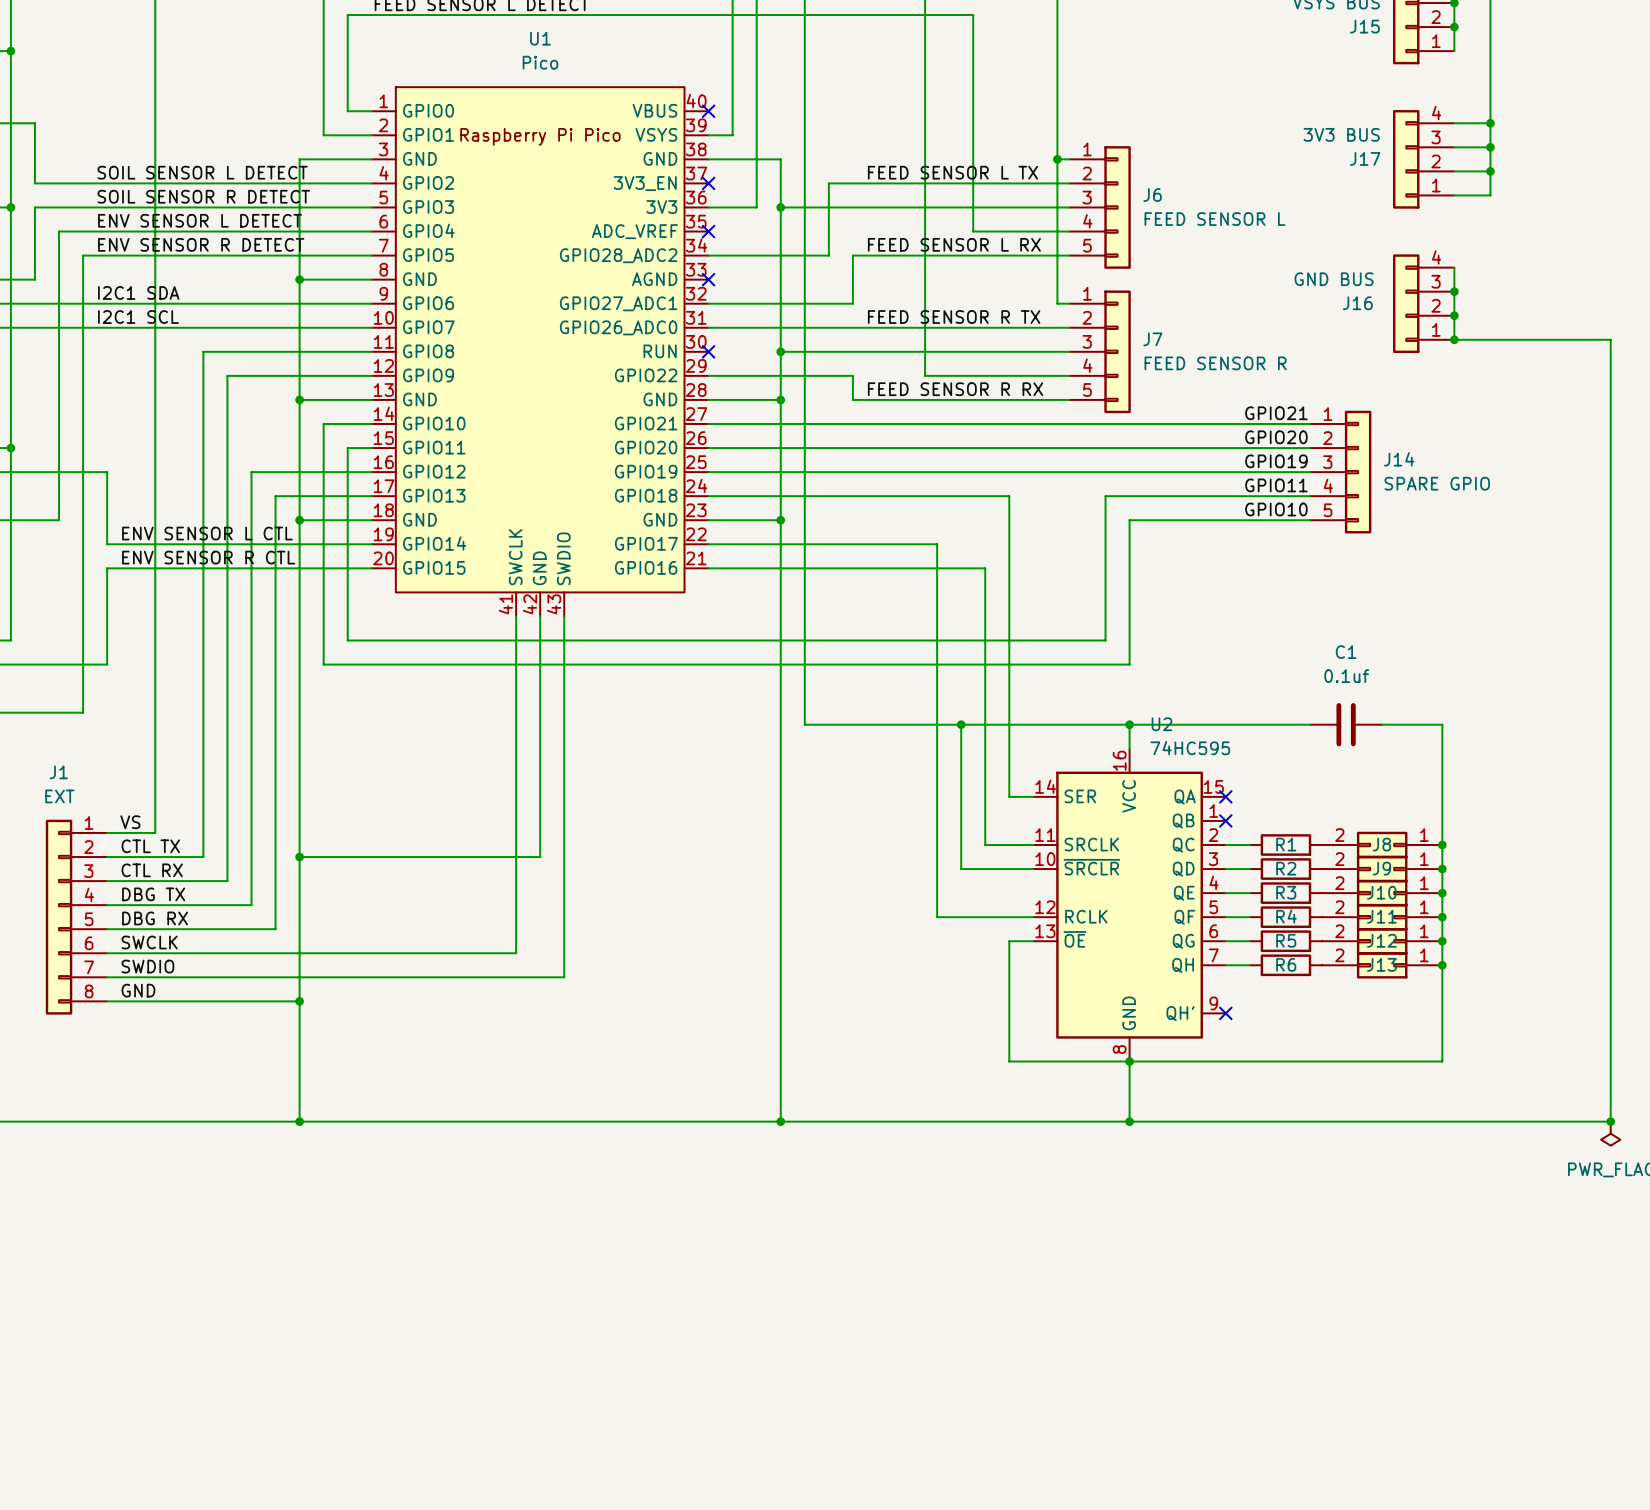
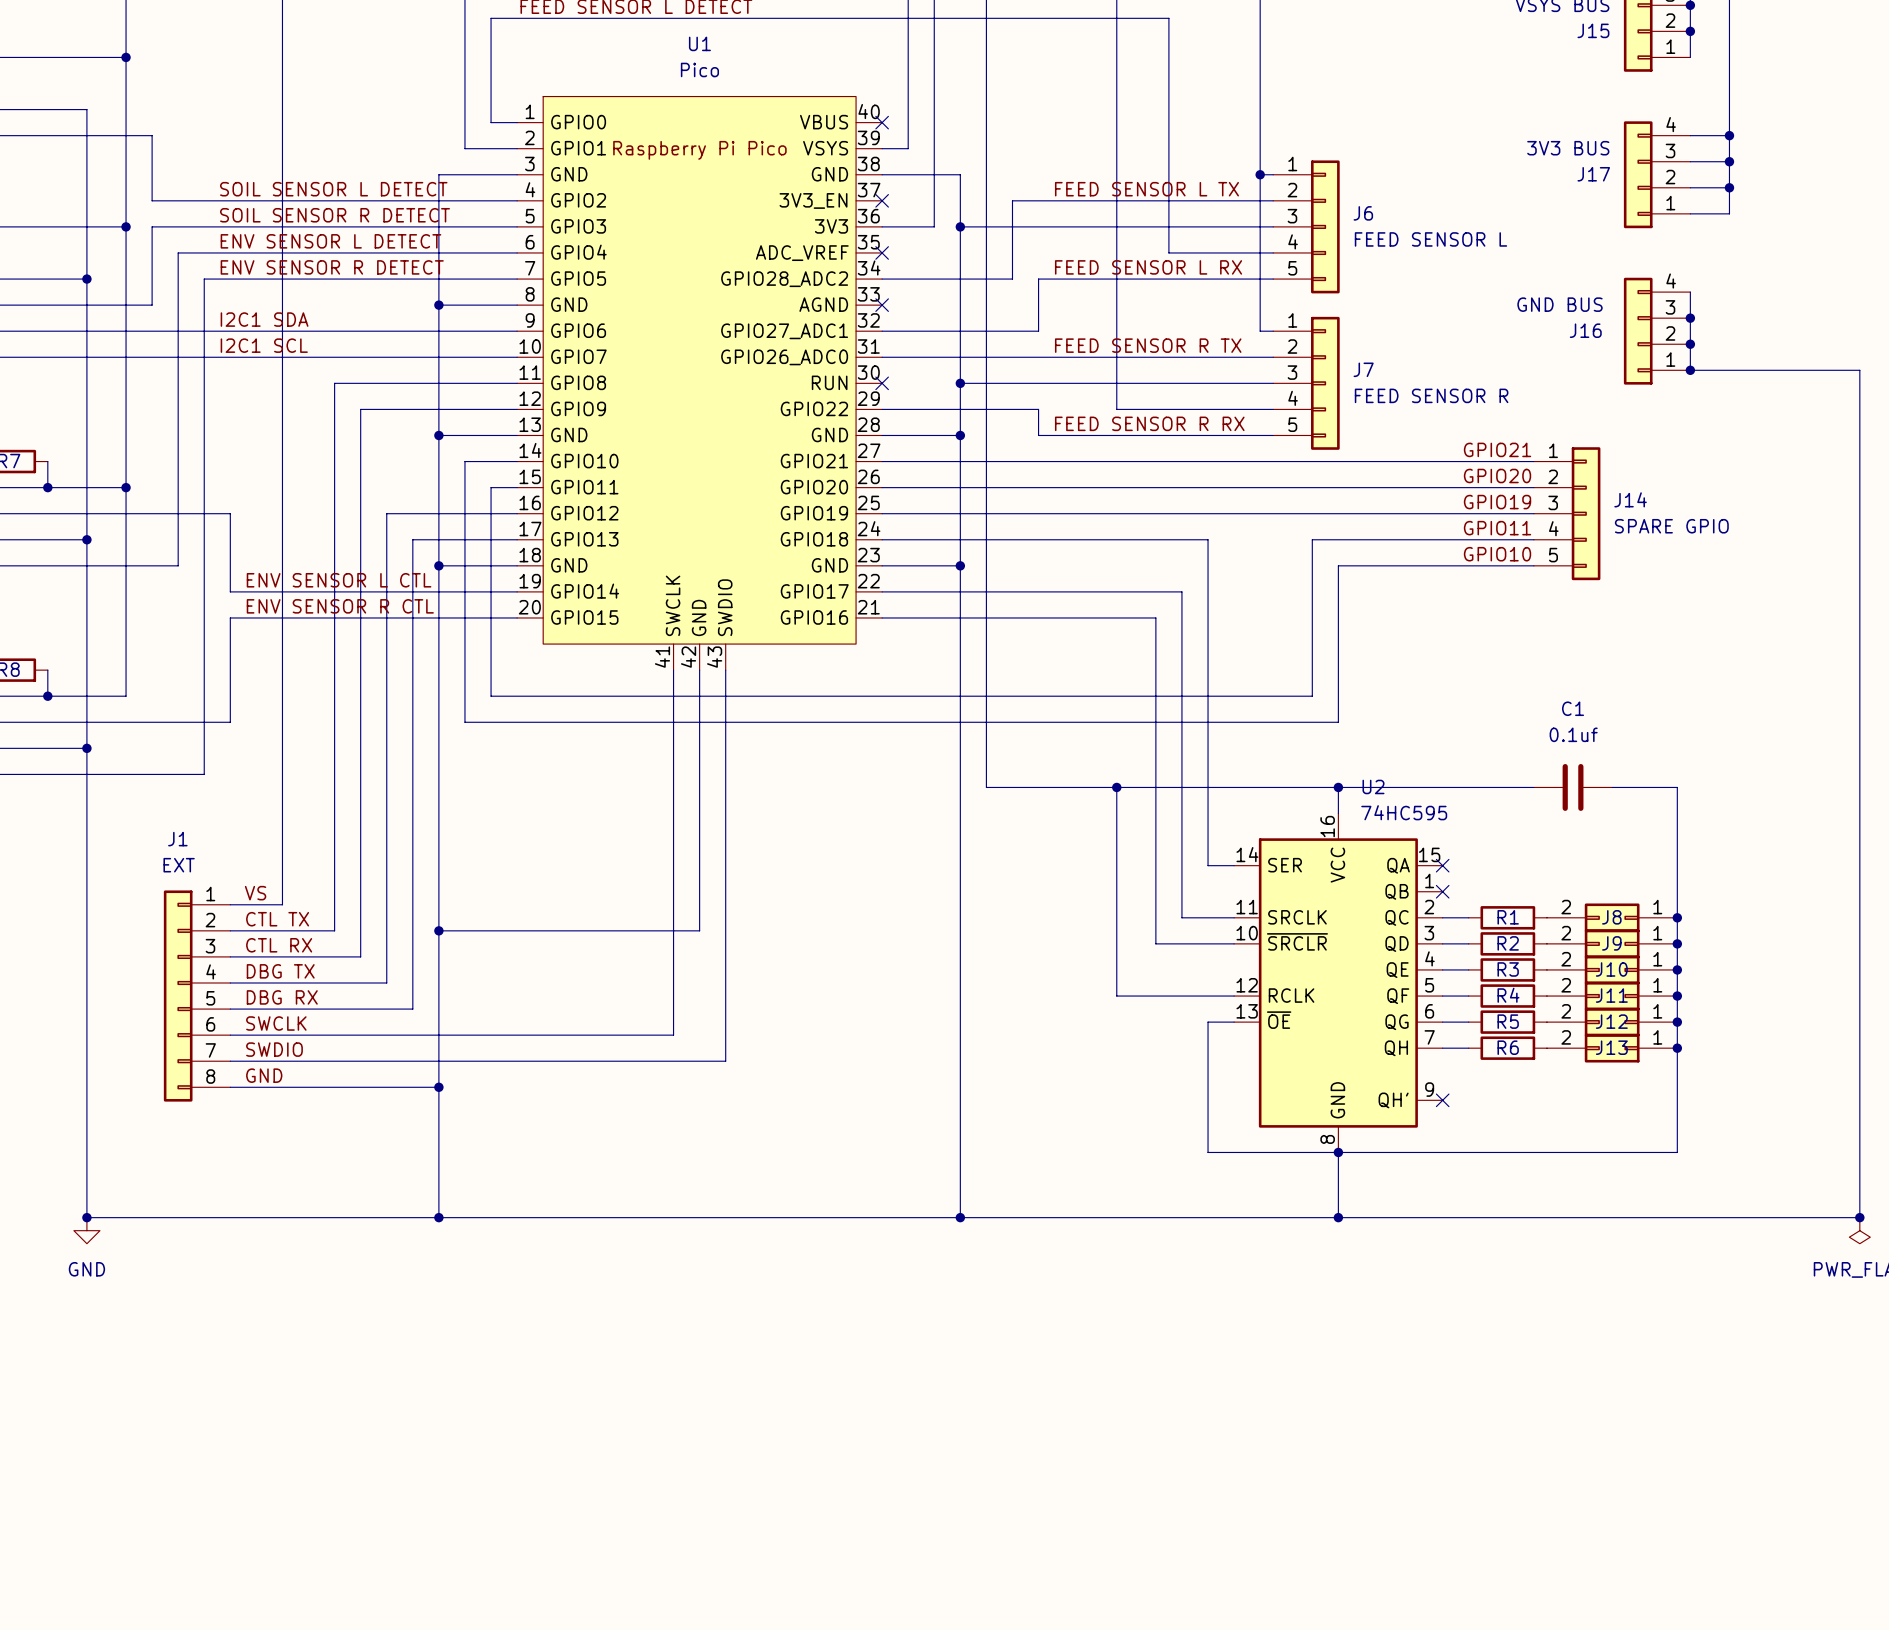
wire: (937, 544) (937, 917) -> (1116, 787) (1116, 996) (1129, 996)
wire: (961, 568) (985, 568) -> (1129, 591) (1181, 591) (1181, 617)
wire: none -> (1155, 617) (1155, 787)
junction position: (961, 724) -> (1116, 787)

